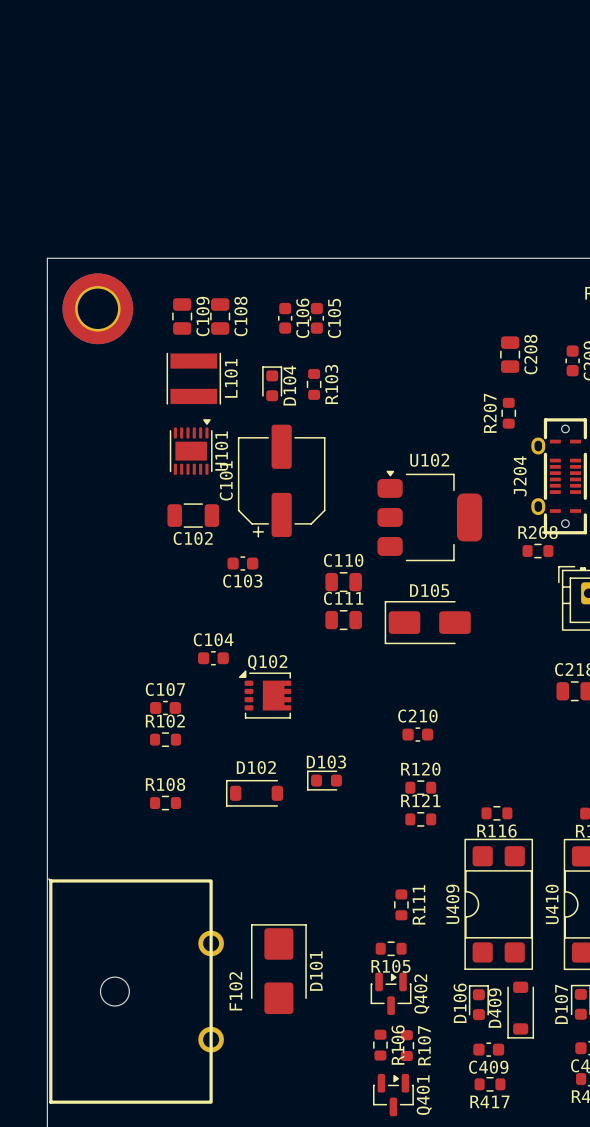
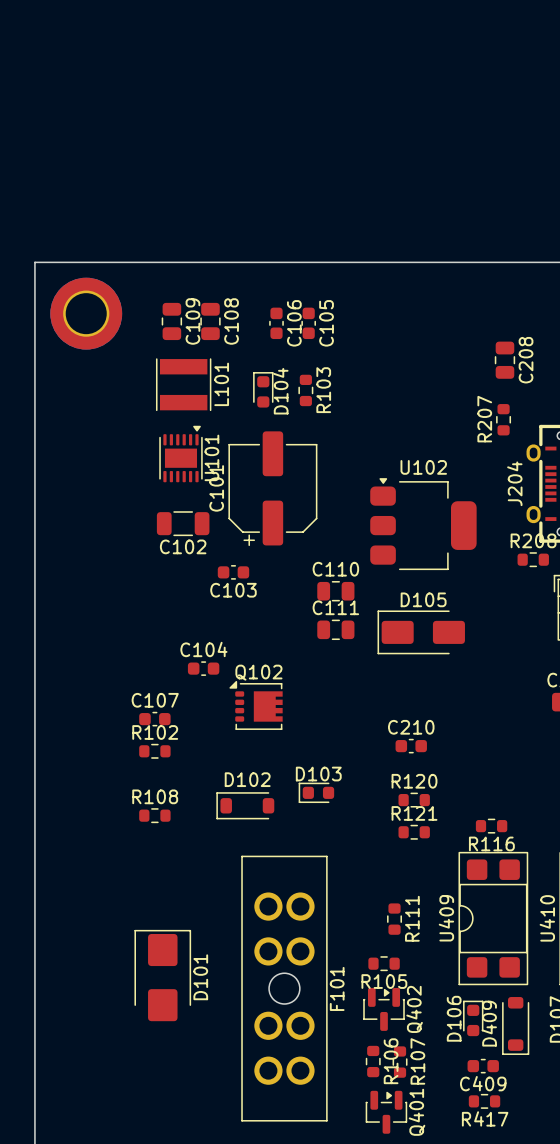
D101 position: (278, 969) -> (162, 975)
F101: none -> (284, 988)
F102: (136, 991) -> none

